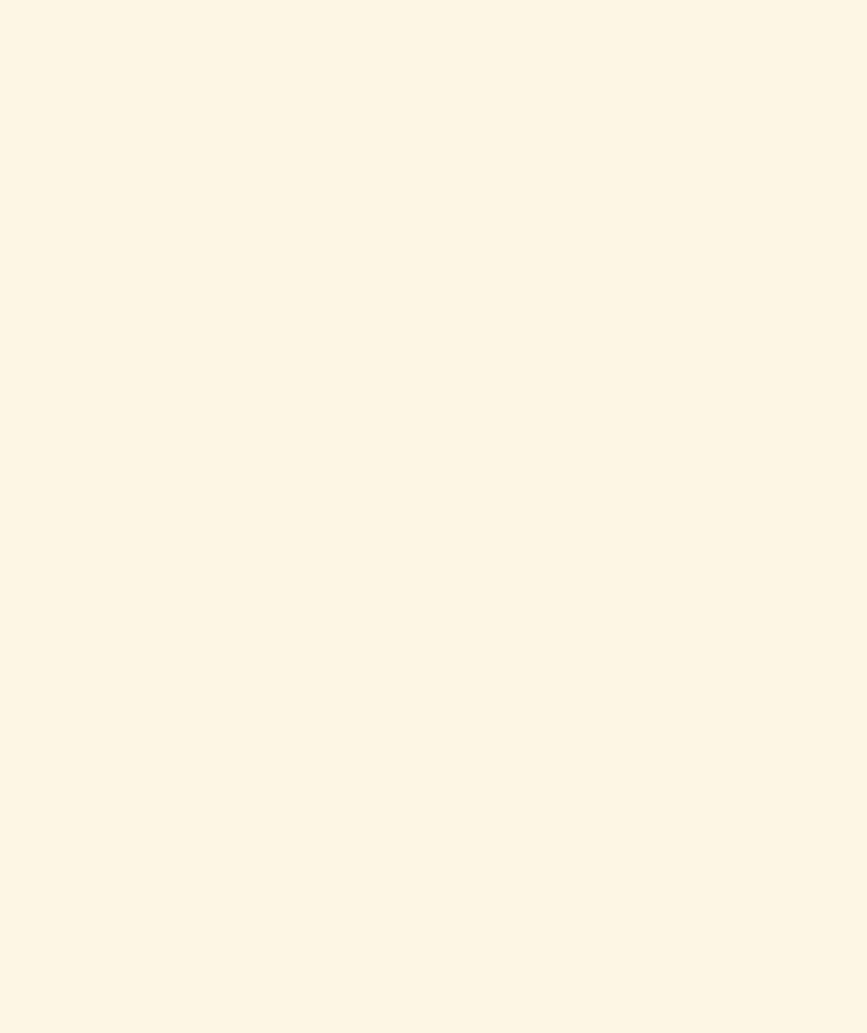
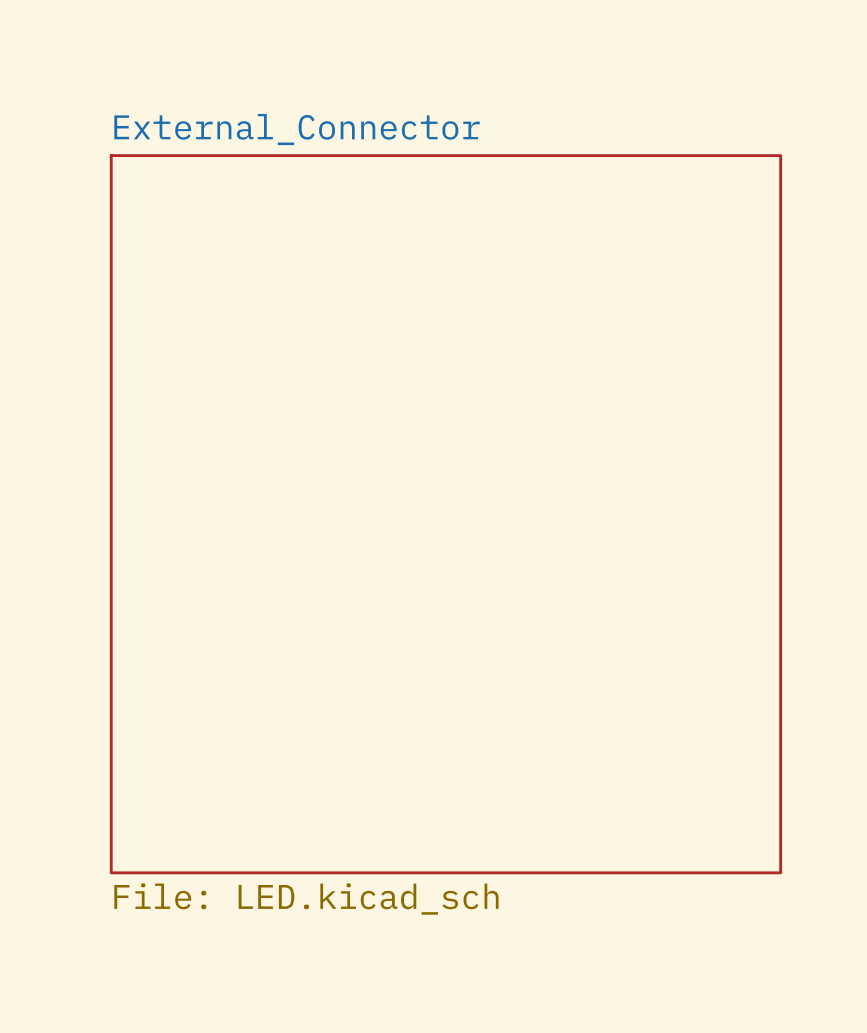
sheet External_Connector: none -> File: LED.kicad_sch (445, 514)

